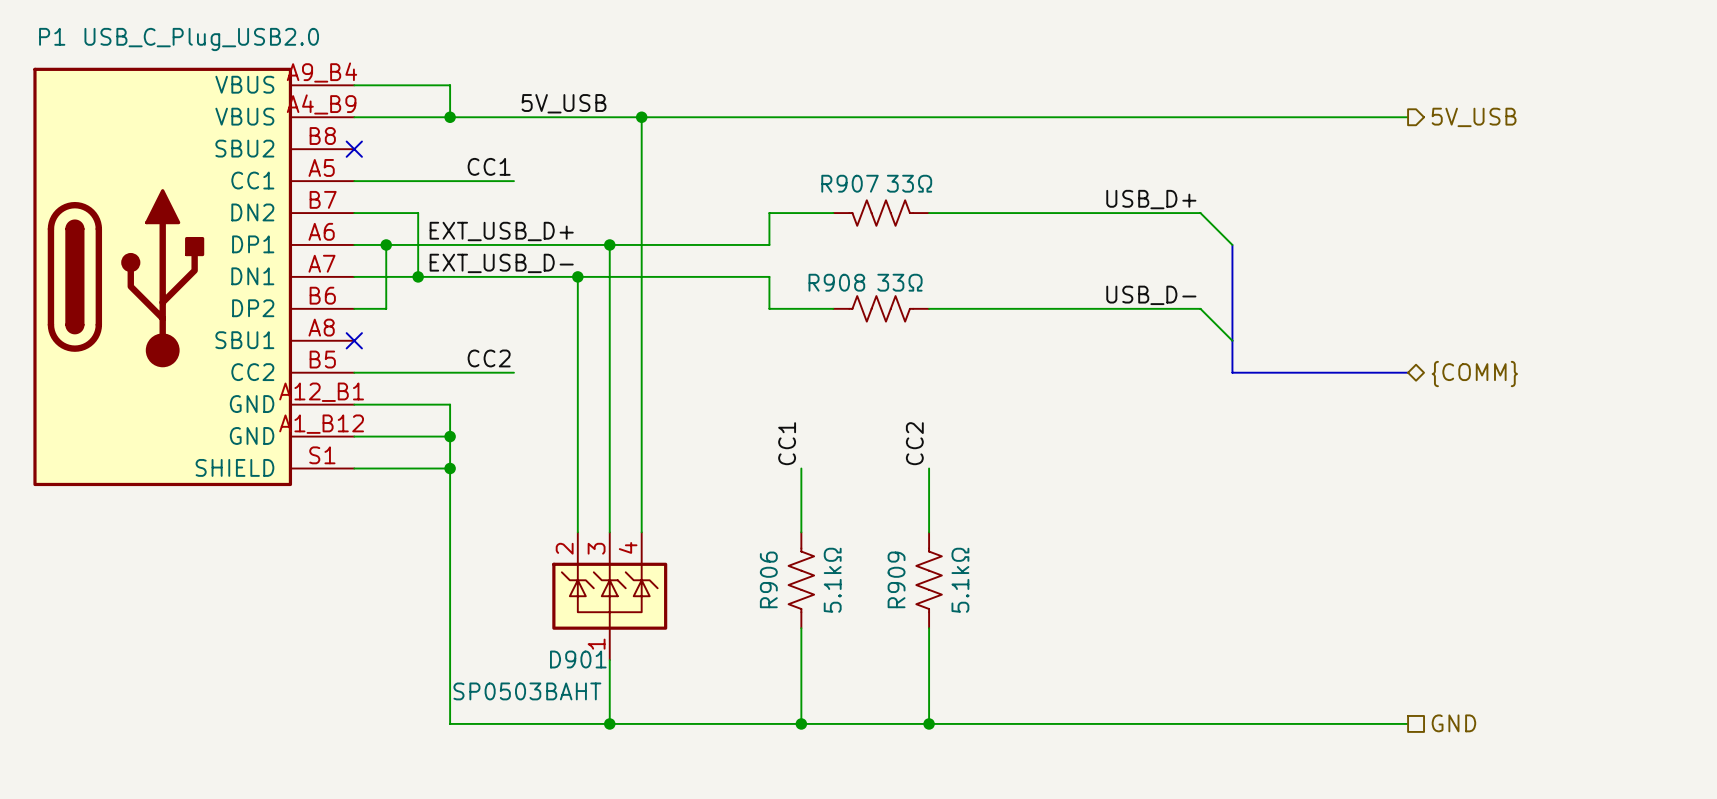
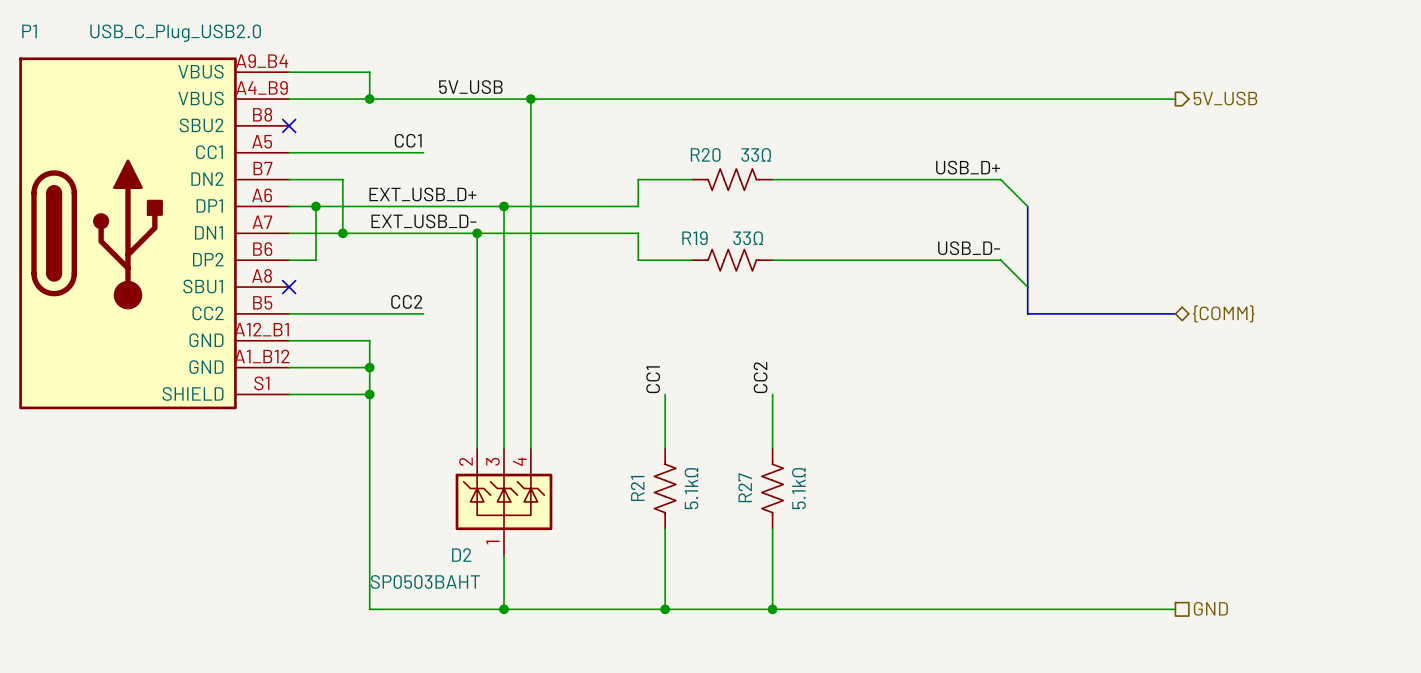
R907 name: R907 (850, 183) -> R20 (705, 154)
R908 name: R908 (836, 282) -> R19 (694, 238)
R906 name: R906 (768, 579) -> R21 (637, 488)
R909 name: R909 (896, 579) -> R27 (745, 487)
D901 name: D901 (578, 659) -> D2 (461, 555)

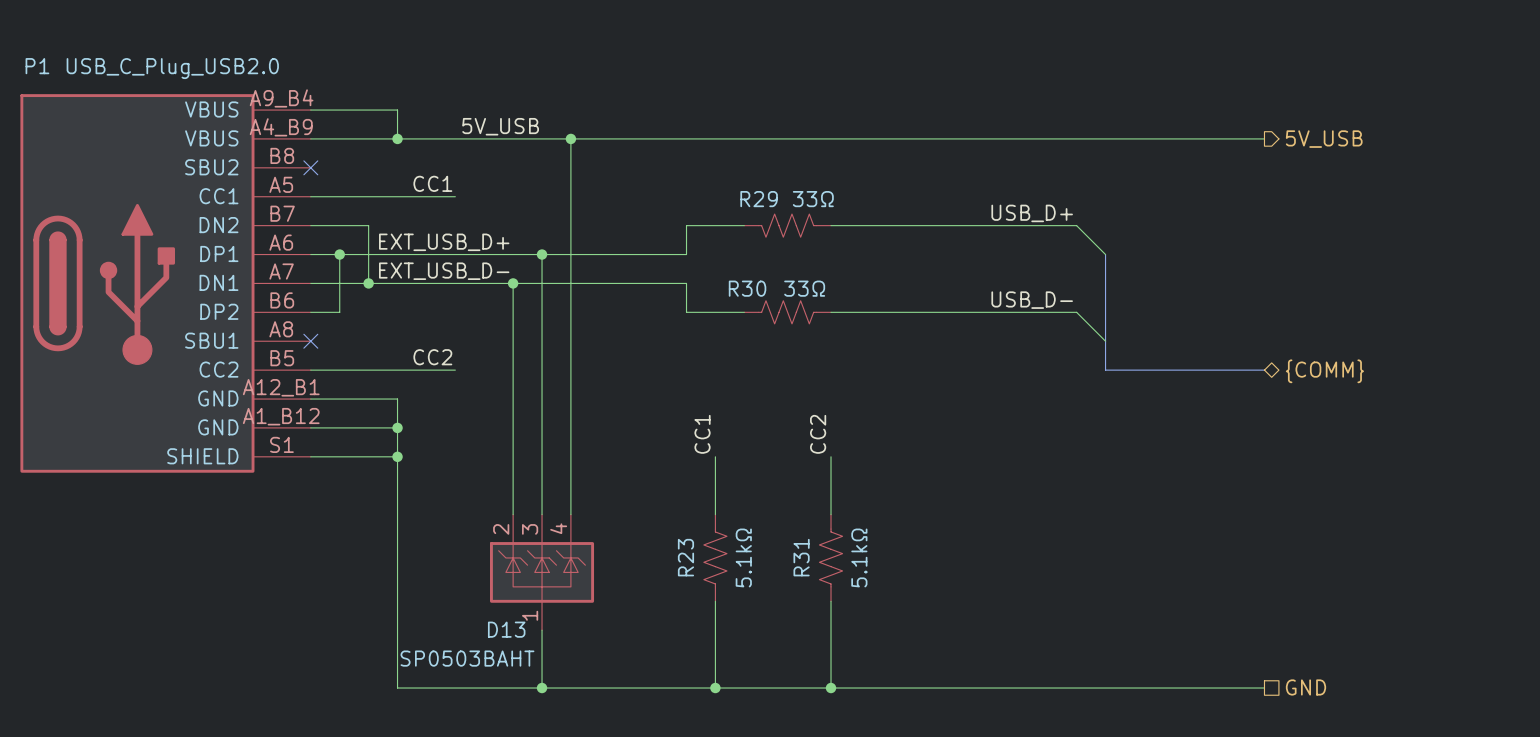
R20 name: R20 (705, 154) -> R29 (759, 199)
R19 name: R19 (694, 238) -> R30 (747, 288)
R27 name: R27 (745, 487) -> R31 (801, 557)
R21 name: R21 (637, 488) -> R23 (685, 557)
D2 name: D2 (461, 555) -> D13 (506, 629)

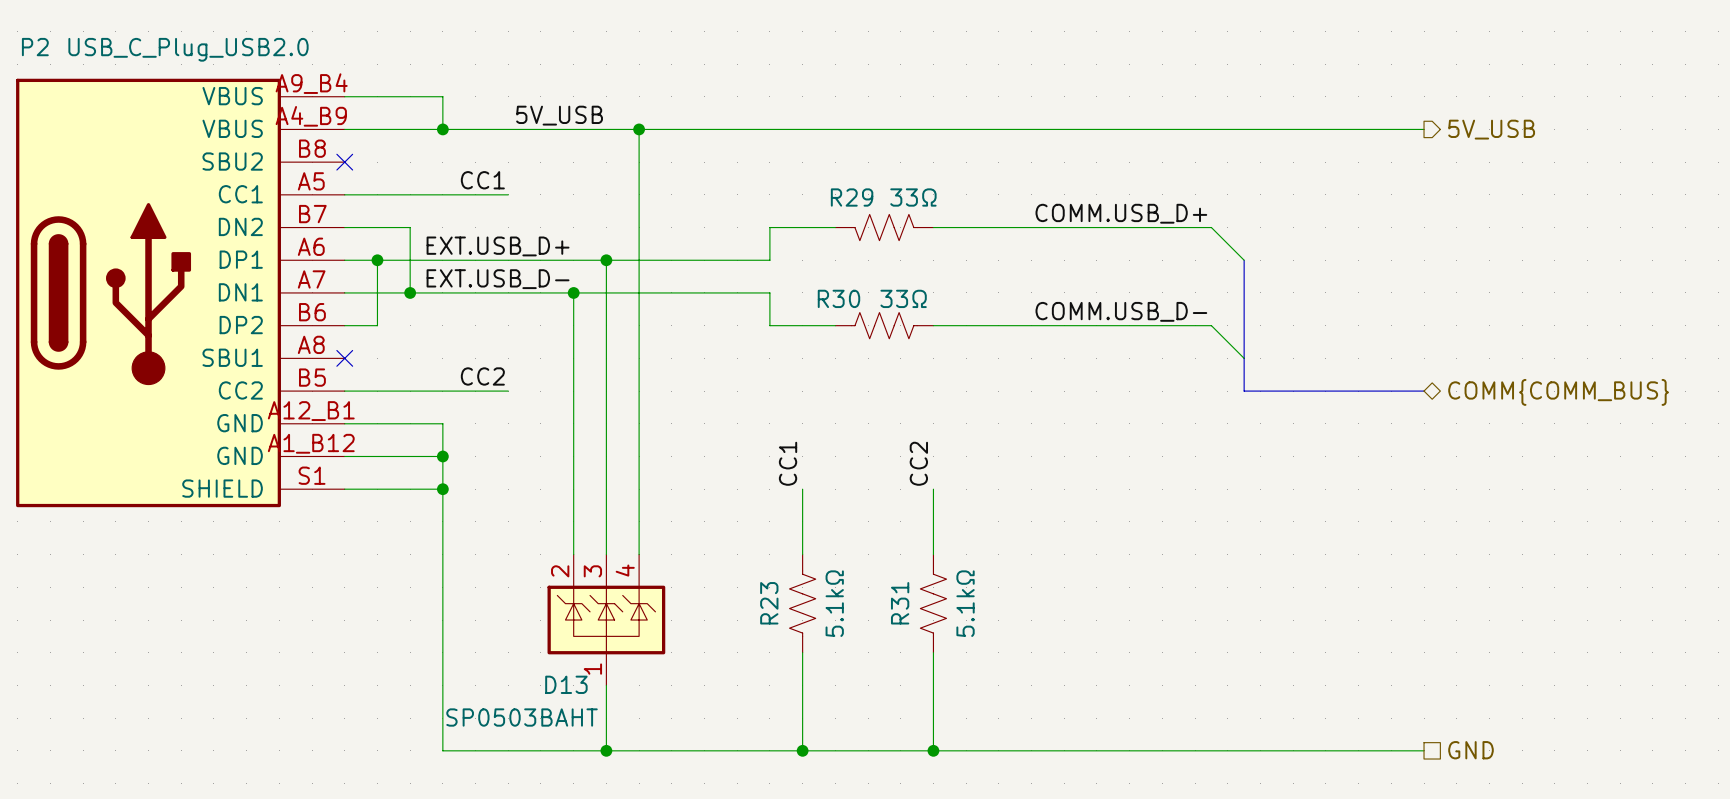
P1 name: P1 (37, 66) -> P2 (35, 47)
label: USB_D+ (1032, 213) -> COMM.USB_D+ (1121, 213)
label: EXT_USB_D+ (444, 242) -> EXT.USB_D+ (498, 246)
label: EXT_USB_D- (444, 271) -> EXT.USB_D- (498, 279)
label: USB_D- (1032, 300) -> COMM.USB_D- (1121, 311)
hierarchical label: {COMM} (1324, 371) -> COMM{COMM_BUS} (1558, 392)

